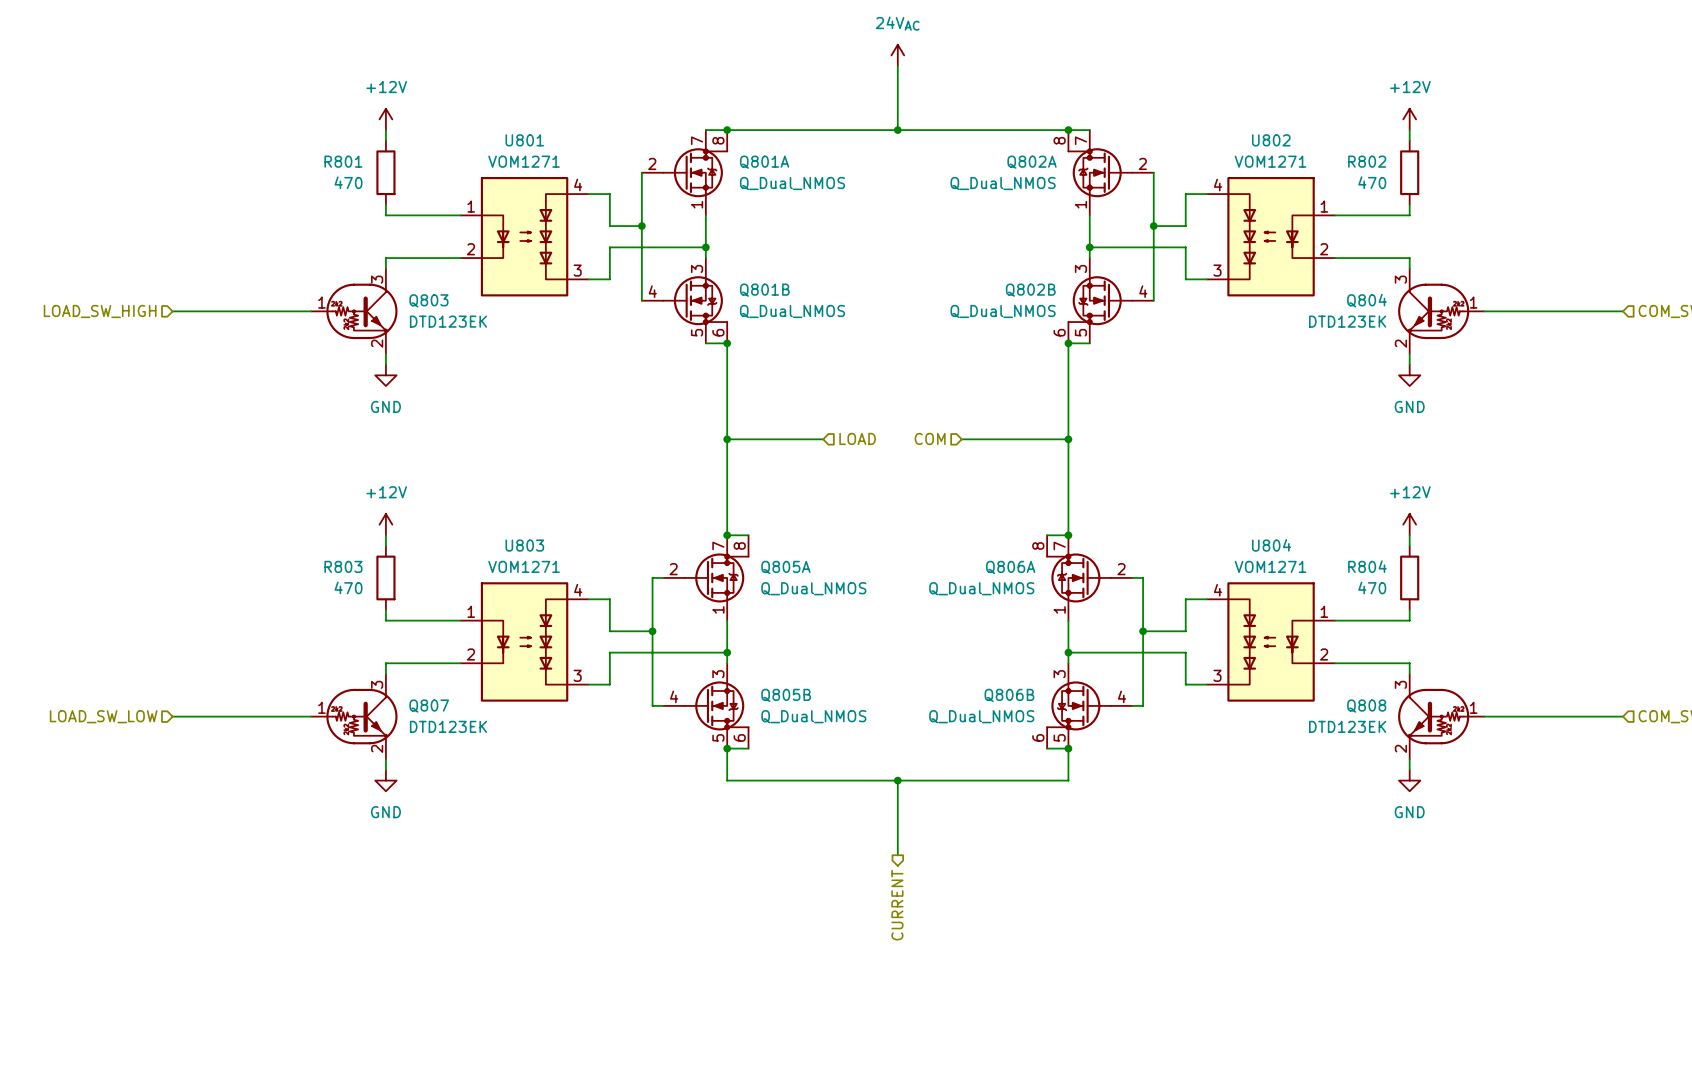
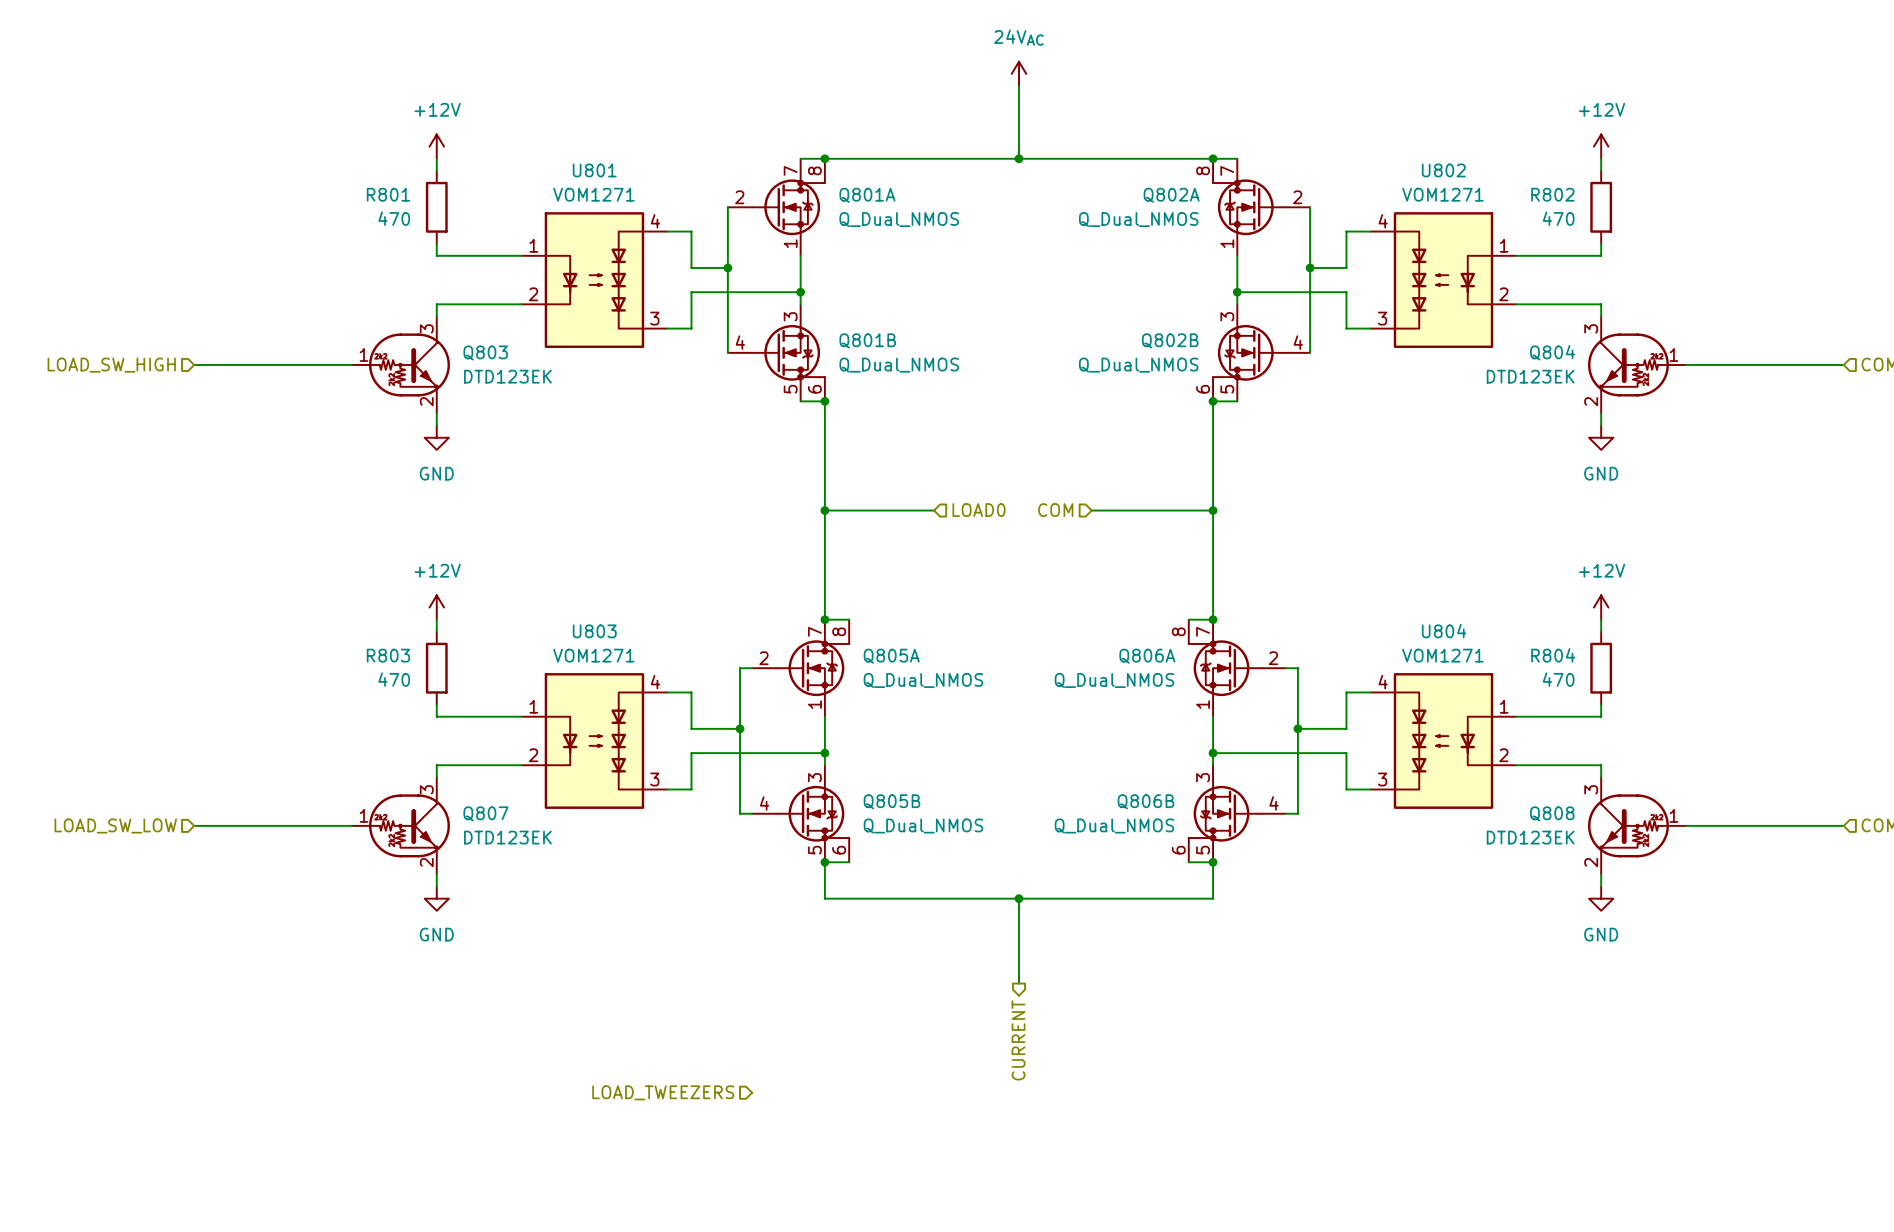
hierarchical label: LOAD (857, 438) -> LOAD0 (979, 510)
hierarchical label: none -> LOAD_TWEEZERS (663, 1092)

